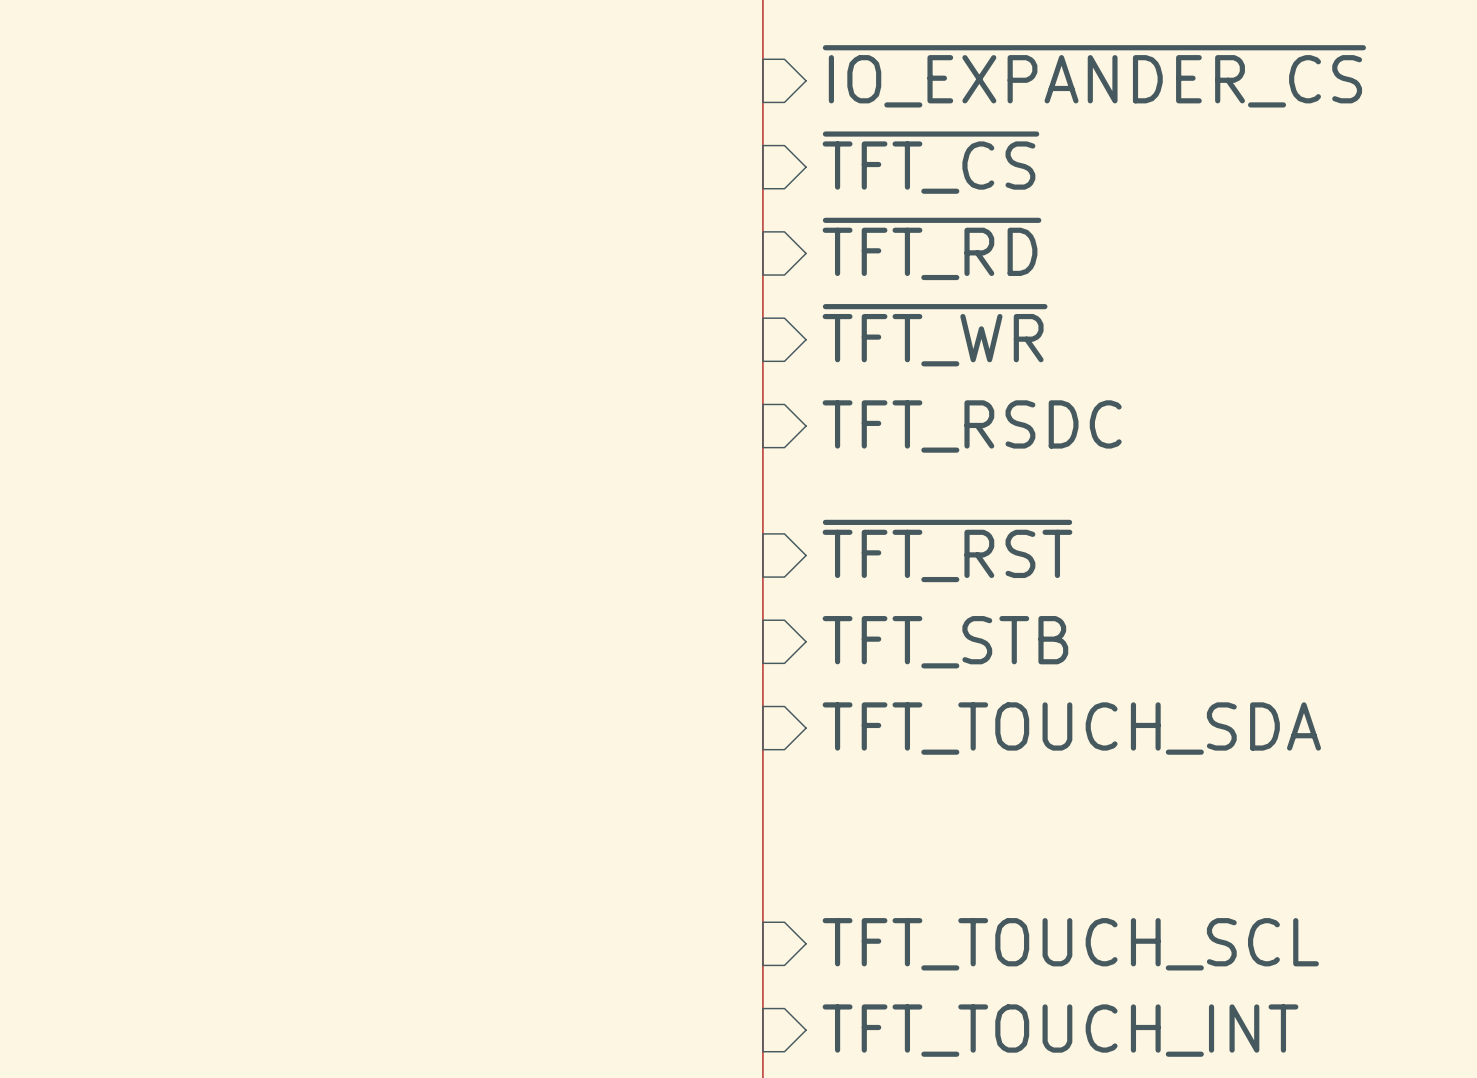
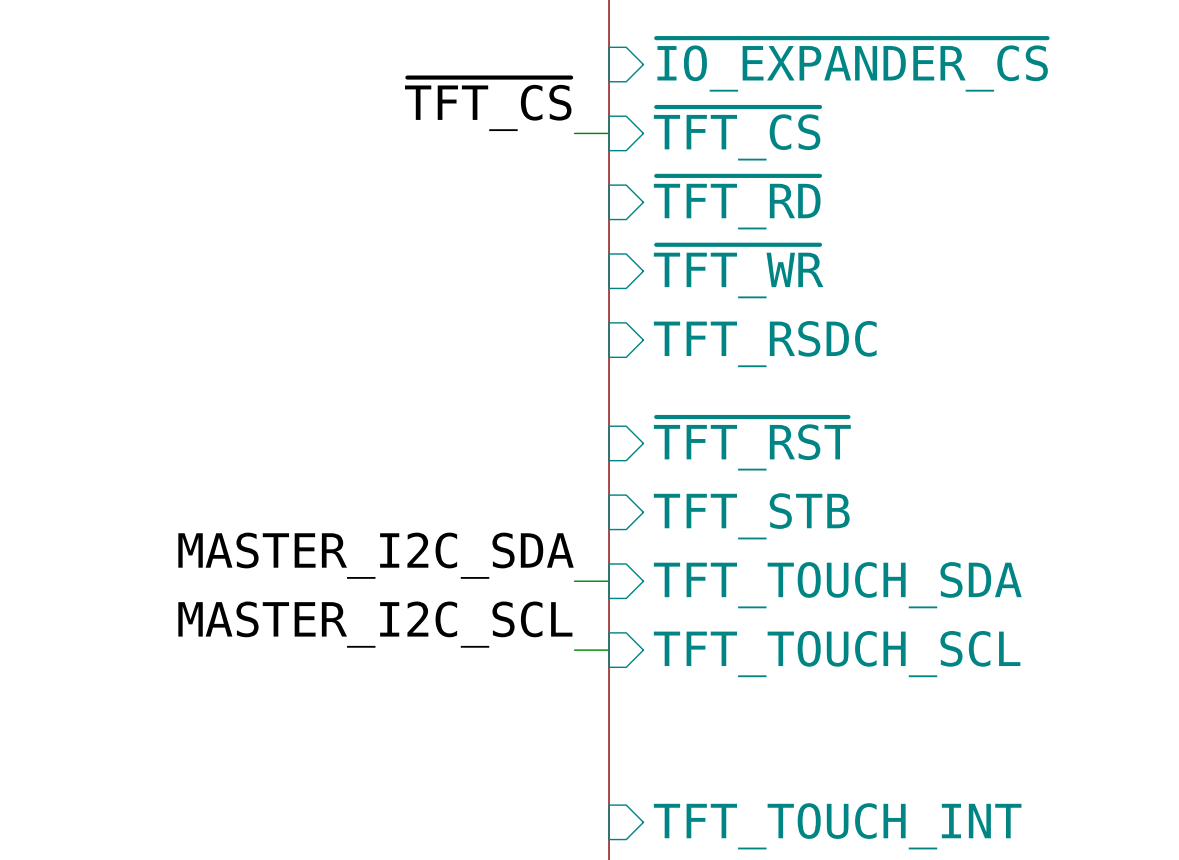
label: none -> ~{TFT_CS} (488, 104)
wire: none -> (574, 133) (609, 133)
label: none -> MASTER_I2C_SDA (376, 555)
wire: none -> (574, 581) (609, 581)
label: none -> MASTER_I2C_SCL (375, 624)
wire: none -> (574, 650) (609, 650)
sheet pin position: TFT_TOUCH_SCL (1070, 944) -> TFT_TOUCH_SCL (837, 654)

